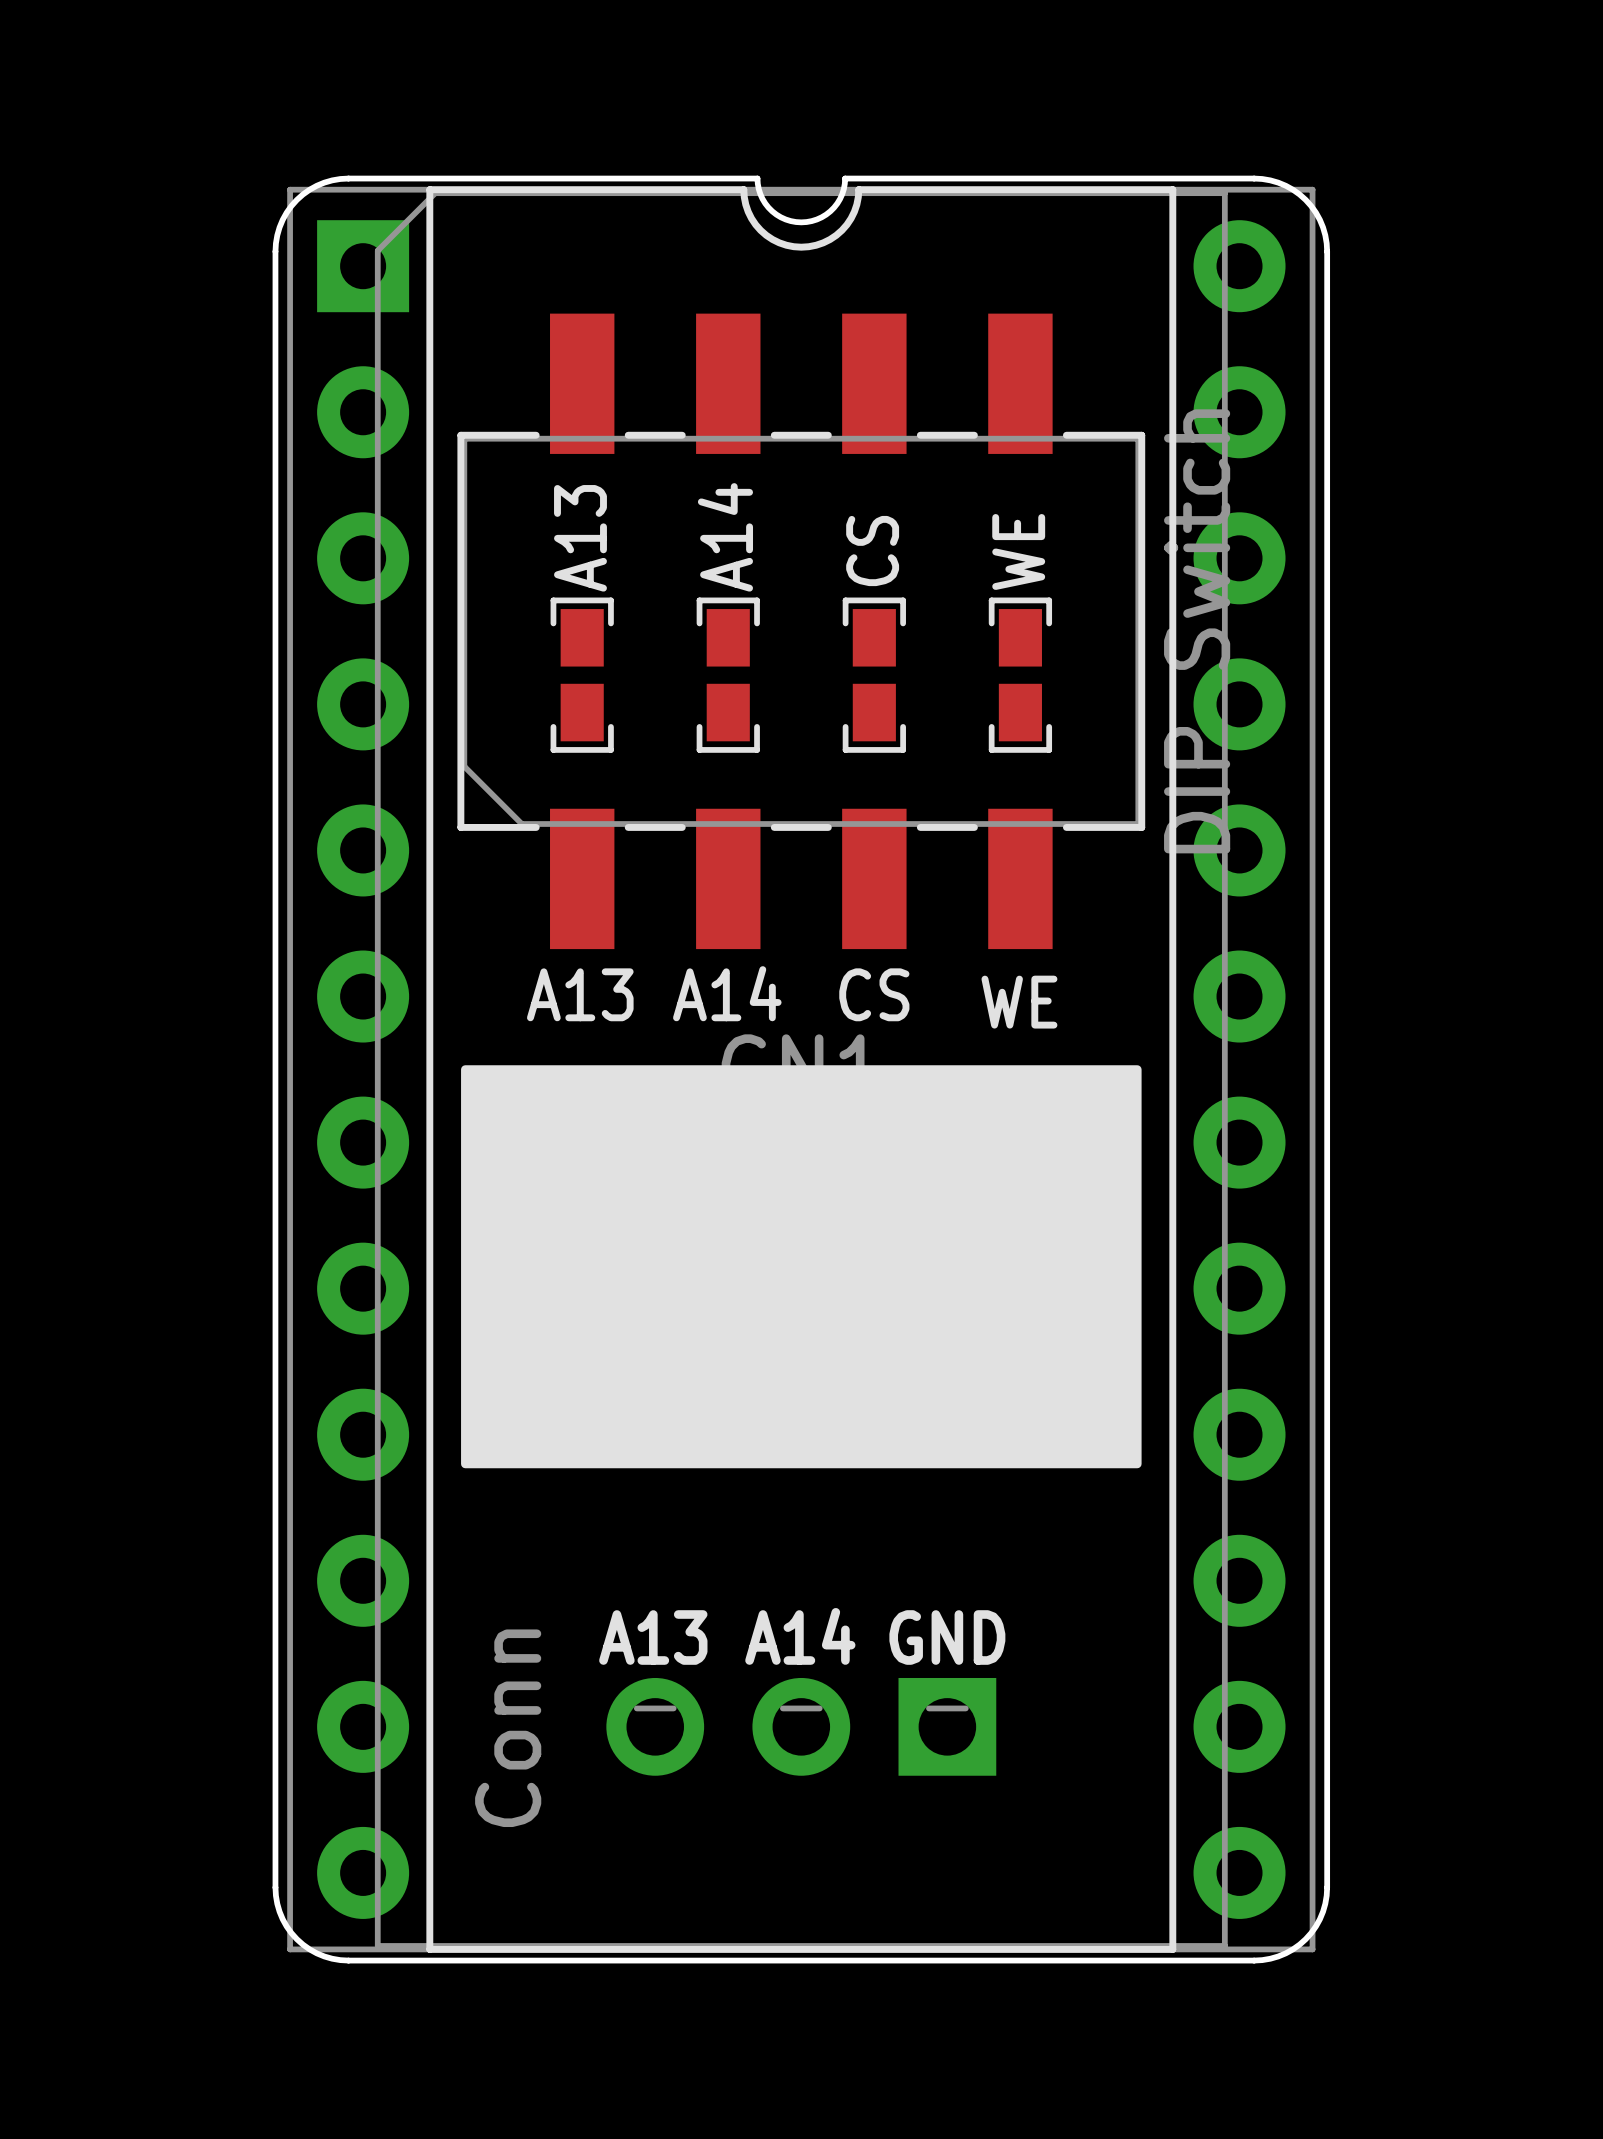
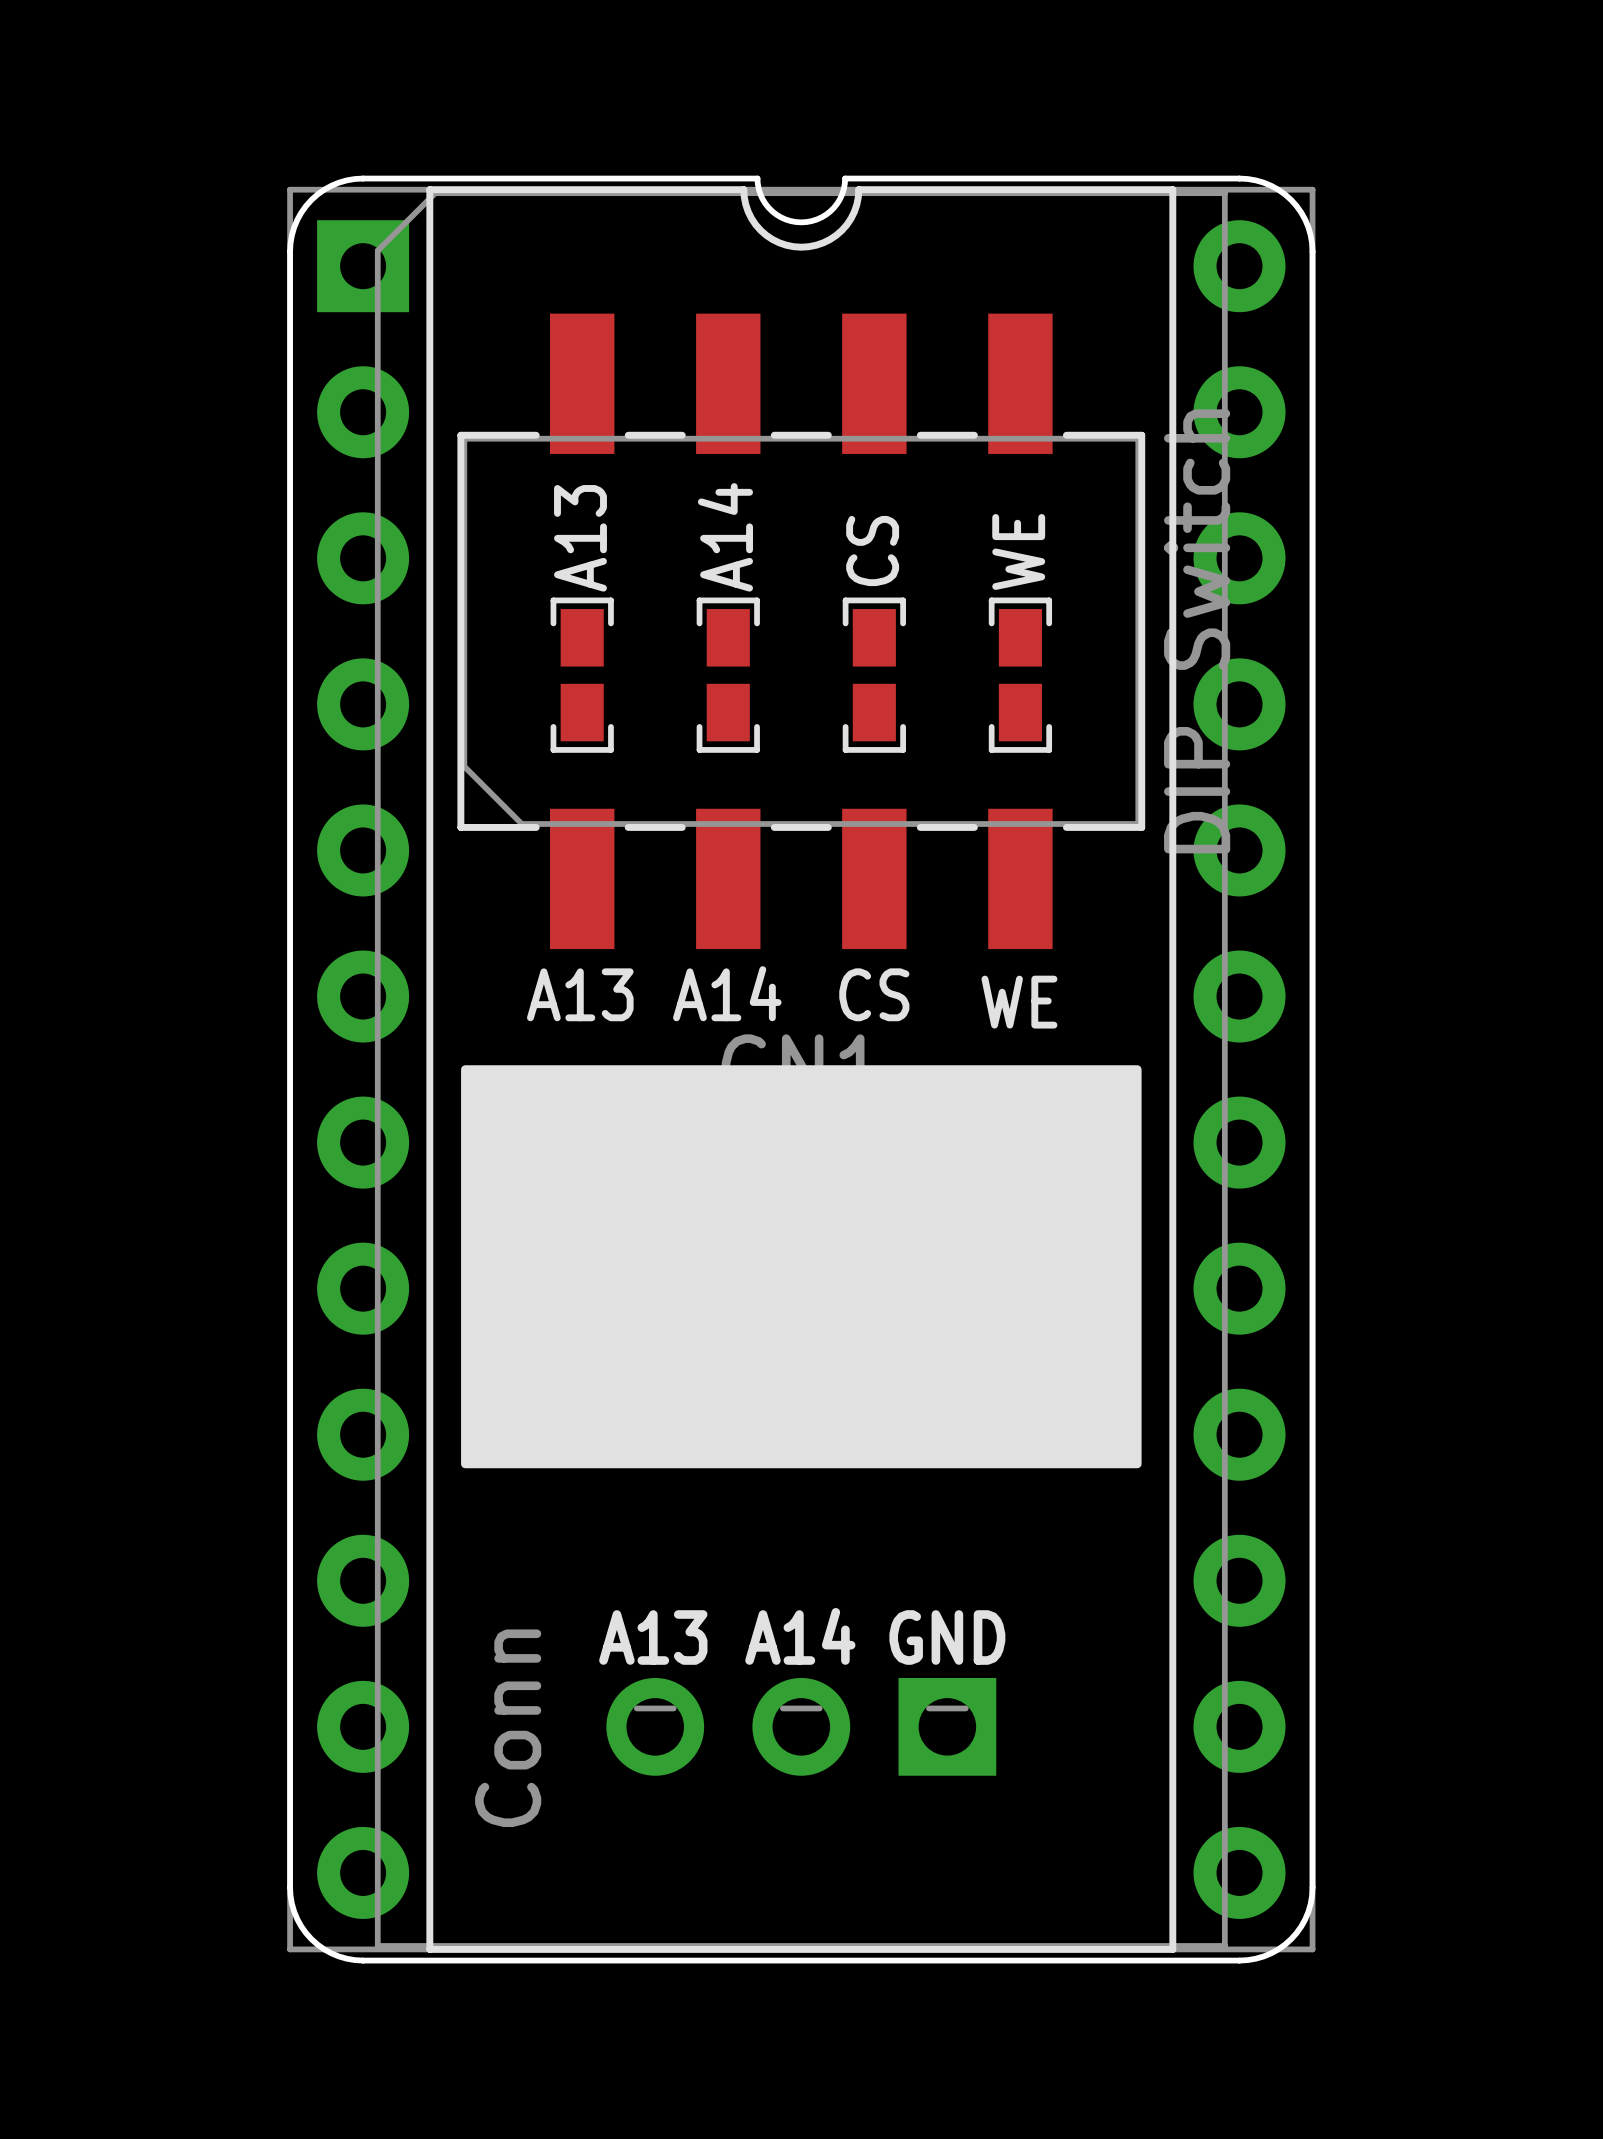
board edge: (363, 178) (332, 180) (316, 185) (302, 194) (291, 206) (282, 219) (277, 235) (275, 251) (275, 1887) (277, 1903) (282, 1919) (291, 1933) (302, 1944) (316, 1953) (332, 1958) (363, 1960) -> (363, 178) (346, 180) (331, 185) (311, 199) (301, 212) (294, 227) (290, 251) (290, 1887) (291, 1903) (297, 1919) (311, 1939) (331, 1953) (346, 1958) (363, 1960)
board edge: (1239, 178) (1270, 180) (1285, 185) (1299, 194) (1311, 206) (1319, 219) (1325, 235) (1327, 251) (1327, 1887) (1325, 1903) (1319, 1919) (1311, 1933) (1299, 1944) (1285, 1953) (1270, 1958) (1239, 1960) -> (1239, 178) (1263, 182) (1278, 189) (1291, 199) (1301, 212) (1308, 227) (1312, 251) (1312, 1887) (1310, 1903) (1305, 1919) (1291, 1939) (1278, 1949) (1263, 1956) (1239, 1960)

